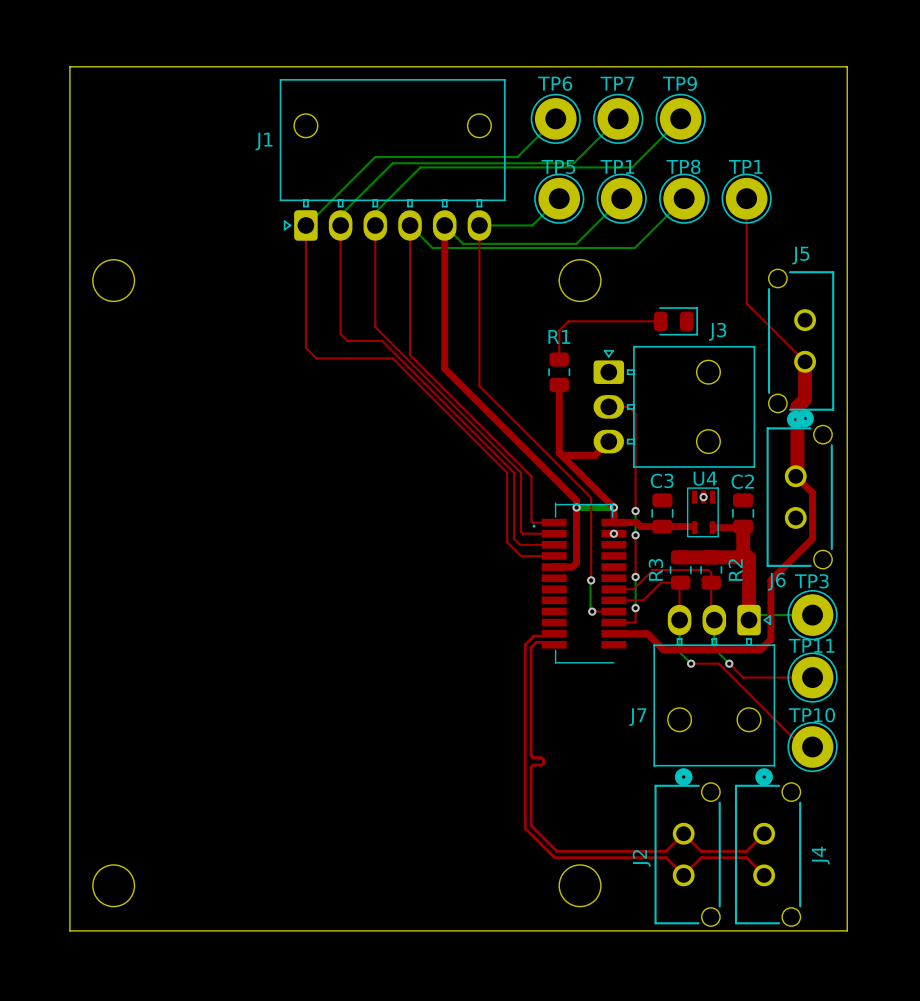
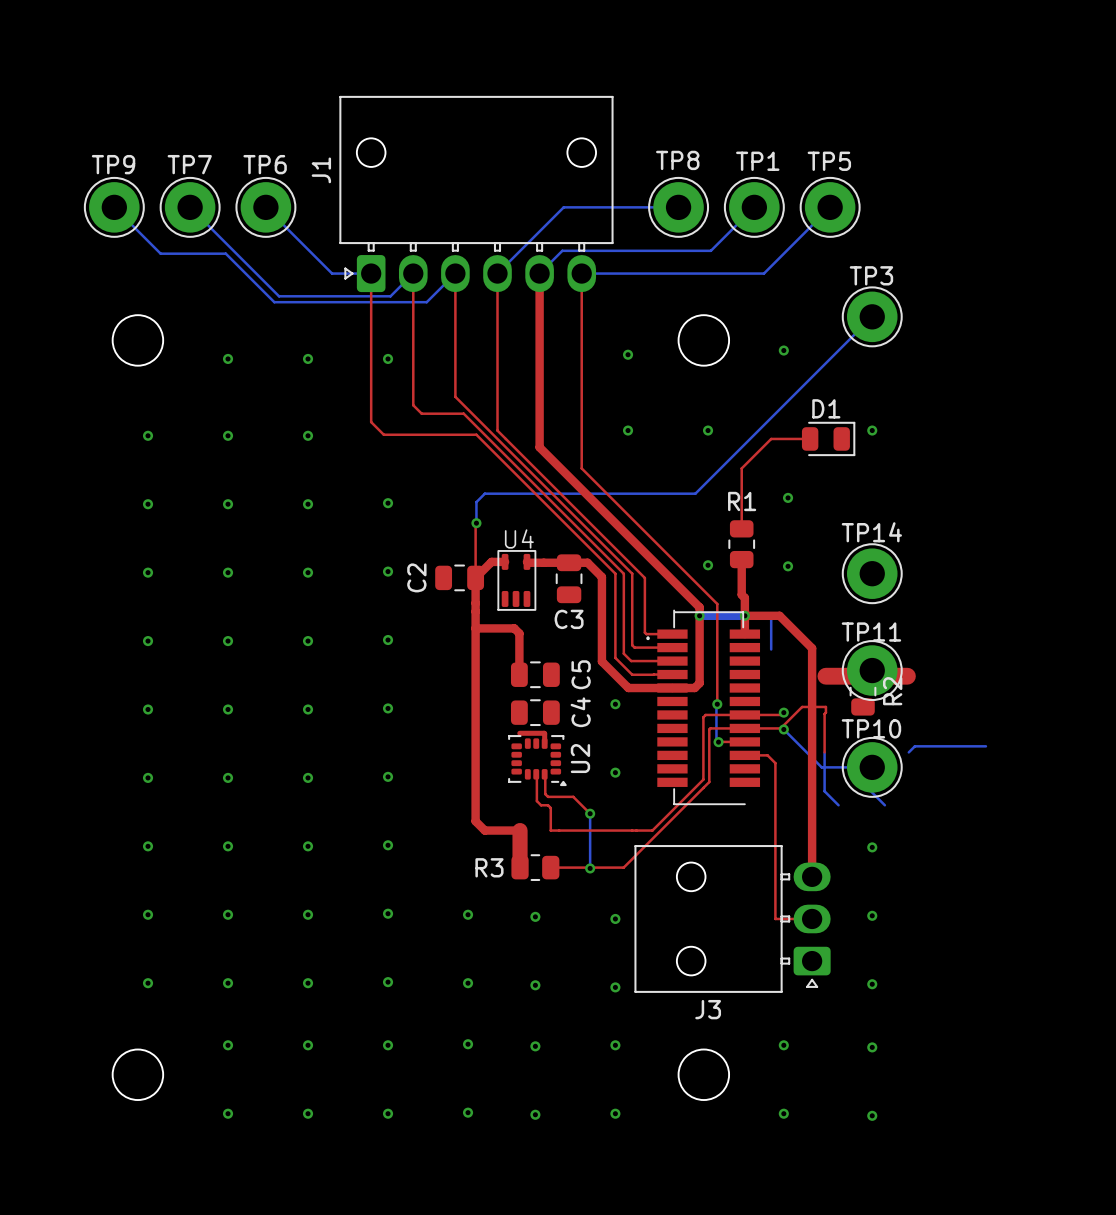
board edge: (69, 66) (847, 66) (847, 930) (69, 930) (69, 66) -> none
bottom track: (555, 118) (517, 157) (375, 157) (305, 225) -> (265, 207) (332, 273) (371, 273)
TP6 position: (555, 118) -> (265, 207)
bottom track: (618, 118) (573, 163) (392, 163) (340, 215) (340, 225) -> (190, 207) (279, 296) (390, 296) (413, 273)
TP7 position: (618, 118) -> (190, 207)
bottom track: (680, 118) (632, 167) (420, 167) (375, 212) (375, 225) -> (114, 207) (160, 253) (225, 253) (274, 302) (426, 302) (455, 273)
TP9 position: (680, 118) -> (114, 207)
J1 name rotation: 0° (264, 141) -> 90° counterclockwise (321, 170)
TP1 name position: TP1 (617, 166) -> TP1 (757, 161)
TP8 name position: TP8 (683, 166) -> TP8 (677, 160)
TP5 name position: TP5 (558, 167) -> TP5 (829, 161)
bottom track: (559, 198) (532, 225) -> (830, 207) (763, 273) (646, 273)
TP5 position: (559, 198) -> (830, 207)
bottom track: (621, 198) (576, 243) (463, 243) (444, 225) -> (754, 207) (710, 250) (562, 250) (539, 273)
TP1 position: (621, 198) -> (754, 207)
bottom track: (684, 198) (634, 248) (432, 248) (410, 225) -> (678, 207) (563, 207) (497, 273)
TP8 position: (684, 198) -> (678, 207)
top track: (746, 198) (746, 303) (805, 361) (805, 399) (797, 406) (797, 474) (795, 476) (812, 493) (812, 538) (770, 580) (770, 639) (760, 649) (663, 649) (647, 633) (613, 633) -> none
TP1: (746, 198) -> none
bottom track: none -> (872, 316) (695, 493) (484, 493) (476, 502) (476, 523)
via: none -> (783, 350)
via: none -> (628, 354)
via: none -> (228, 358)
via: none -> (308, 358)
via: none -> (388, 358)
top track: (660, 321) (568, 321) (559, 330) (559, 359) -> none
part: (675, 321) -> none
J5: (801, 348) -> none
via: none -> (628, 430)
via: none -> (708, 430)
via: none -> (872, 430)
via: none -> (148, 435)
via: none -> (228, 435)
via: none -> (308, 435)
top track: none -> (810, 438) (771, 438) (741, 468) (741, 528)
D1: none -> (828, 438)
R1 position: (559, 372) -> (741, 544)
top track: (559, 384) (559, 452) (613, 507) -> none
top track: (608, 406) (628, 406) (635, 413) (635, 510) -> none
J3 rotation: 0° (674, 406) -> 180° (732, 918)
J3 position: (674, 406) -> (732, 918)
via: none -> (788, 497)
via: none -> (388, 503)
via: none -> (148, 504)
via: none -> (228, 504)
via: none -> (308, 504)
top track: none -> (476, 523) (475, 577)
via: none -> (476, 523)
top track: (608, 441) (594, 455) (561, 455) -> none
top track: none -> (741, 559) (741, 594) (744, 597) (744, 615) (779, 615) (812, 648) (812, 876)
top track: none -> (505, 561) (491, 561) (475, 577)
top track: none -> (526, 561) (587, 562) (601, 577) (601, 661) (628, 688) (672, 688)
via: none -> (708, 565)
via: none -> (788, 566)
via: none -> (148, 572)
via: none -> (228, 572)
via: none -> (308, 572)
via: none -> (388, 571)
TP14: none -> (872, 573)
top track: none -> (475, 577) (475, 821) (484, 830) (520, 830) (520, 867)
C3 name position: C3 (662, 480) -> C3 (569, 619)
C2 name position: C2 (742, 481) -> C2 (416, 577)
J6: (799, 489) -> none
via: (703, 497) -> none
via: (635, 510) -> none
U4 rotation: 0° (702, 512) -> 180° (516, 580)
U4 position: (702, 512) -> (516, 580)
C3 position: (662, 513) -> (569, 578)
C2 rotation: 0° (743, 513) -> 90° clockwise (459, 577)
C2 position: (743, 513) -> (459, 577)
top track: none -> (475, 628) (514, 628) (519, 633) (519, 678)
top track: (613, 522) (636, 522) (640, 526) (694, 527) -> none
via: none -> (388, 640)
top track: (712, 527) (743, 526) (743, 552) -> none
via: none -> (148, 641)
via: none -> (228, 641)
via: none -> (308, 641)
via: (613, 533) -> none
top track: (635, 535) (635, 576) -> none
via: (635, 535) -> none
top track: (743, 552) (749, 558) (749, 620) -> none
C5: none -> (535, 674)
R3 rotation: 0° (680, 569) -> 90° clockwise (535, 867)
R3 position: (680, 569) -> (535, 867)
bottom track: (635, 576) (635, 608) -> none
via: (635, 576) -> none
via: none -> (615, 704)
via: none -> (388, 708)
via: none -> (148, 709)
via: none -> (228, 709)
via: none -> (308, 709)
C4: none -> (535, 712)
via: none -> (783, 712)
top track: none -> (744, 714) (705, 714) (703, 717) (703, 779) (652, 830) (550, 830) (550, 808) (548, 805) (541, 805) (536, 801) (536, 774)
top track: (633, 589) (652, 569) (708, 569) (711, 572) (711, 617) (714, 620) -> (768, 714) (781, 714) (783, 712)
top track: none -> (744, 728) (709, 729) (709, 782) (623, 867) (550, 867)
bottom track: none -> (783, 729) (821, 767) (872, 767)
via: none -> (783, 729)
top track: none -> (519, 733) (544, 733) (544, 743)
top track: (635, 608) (635, 622) (632, 622) -> (812, 918) (775, 918) (775, 763) (767, 755)
via: (635, 608) -> none
TP3 position: (812, 615) -> (872, 316)
U2: none -> (537, 760)
top track: (554, 633) (533, 636) (525, 644) (525, 828) (554, 857) (665, 857) (683, 875) (701, 857) (746, 857) (764, 875) -> none
via: none -> (615, 772)
top track: none -> (545, 774) (545, 794) (548, 796) (573, 796) (590, 813)
via: none -> (388, 776)
via: none -> (148, 777)
via: none -> (228, 777)
via: none -> (308, 777)
top track: (554, 644) (536, 642) (531, 647) (531, 755) (533, 757) (542, 758) (543, 760) (542, 764) (533, 765) (531, 767) (531, 825) (557, 851) (665, 851) (683, 833) (701, 851) (746, 851) (764, 833) -> none
top track: (691, 663) (718, 663) (802, 746) (812, 746) -> none
via: (691, 663) -> none
top track: (729, 663) (743, 677) (812, 677) -> none
via: (729, 663) -> none
bottom track: none -> (590, 813) (590, 868)
via: none -> (590, 813)
TP11 position: (812, 677) -> (872, 670)
J7: (714, 685) -> none
via: none -> (388, 845)
via: none -> (148, 846)
via: none -> (228, 846)
via: none -> (308, 846)
via: none -> (872, 847)
via: none -> (590, 868)
TP10 position: (812, 746) -> (872, 767)
via: none -> (148, 914)
via: none -> (228, 914)
via: none -> (308, 914)
via: none -> (388, 913)
via: none -> (468, 914)
via: none -> (872, 915)
via: none -> (535, 916)
via: none -> (615, 918)
via: none -> (388, 982)
via: none -> (148, 983)
via: none -> (228, 983)
via: none -> (308, 983)
via: none -> (468, 983)
via: none -> (872, 984)
via: none -> (535, 985)
via: none -> (615, 987)
J2: (687, 847) -> none
J4: (768, 847) -> none
via: none -> (468, 1044)
via: none -> (228, 1045)
via: none -> (308, 1045)
via: none -> (388, 1045)
via: none -> (615, 1045)
via: none -> (783, 1045)
via: none -> (535, 1046)
via: none -> (872, 1047)
via: none -> (228, 1113)
via: none -> (308, 1113)
via: none -> (388, 1113)
via: none -> (468, 1112)
via: none -> (615, 1113)
via: none -> (783, 1113)
via: none -> (535, 1114)
via: none -> (872, 1115)

